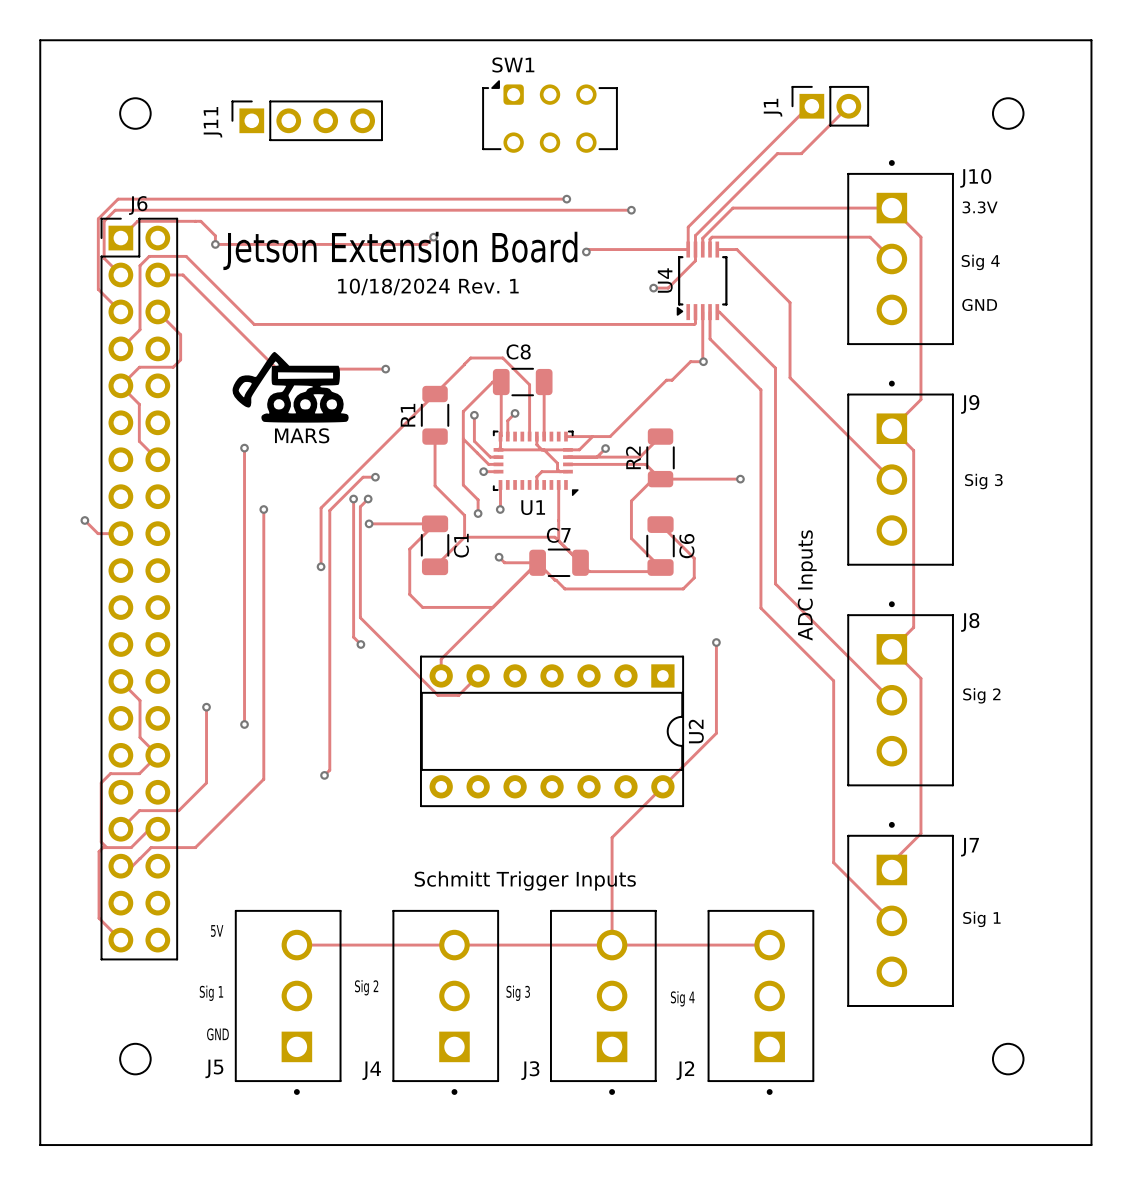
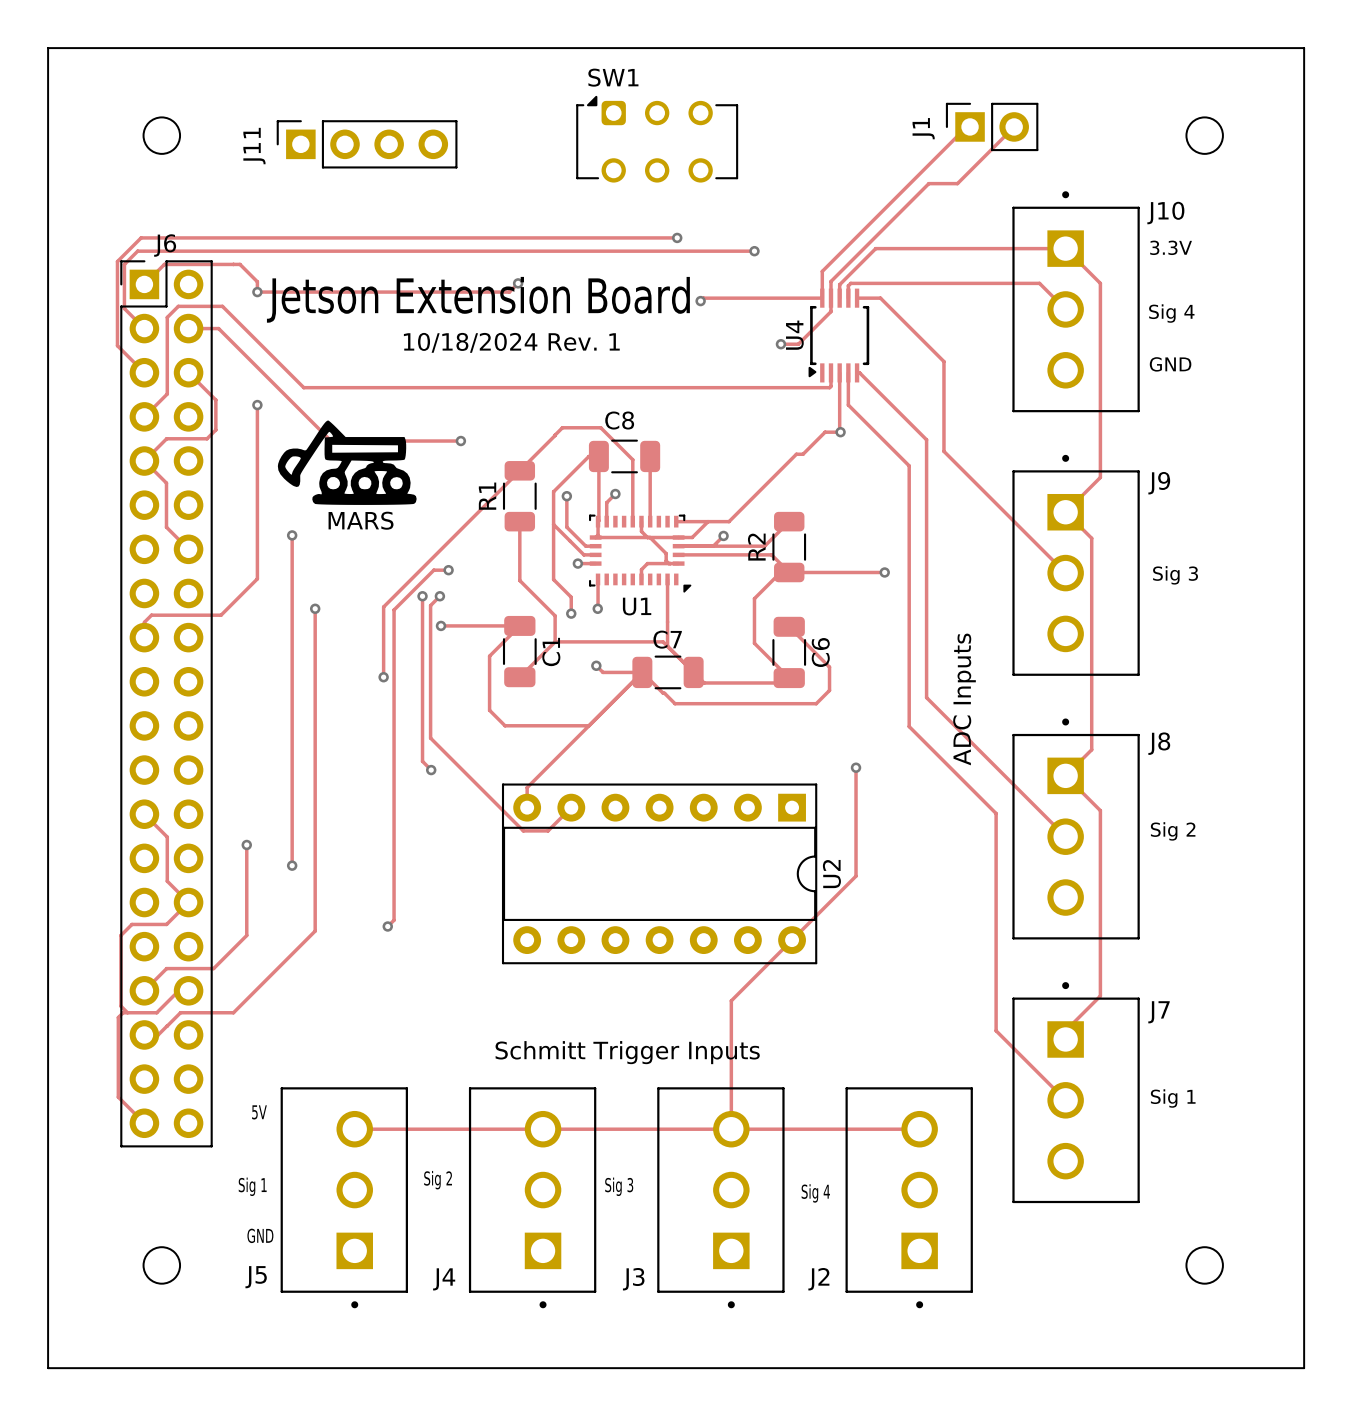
via: none -> (257, 405)
track: (84, 520) (98, 533) (120, 533) -> (257, 405) (257, 578) (221, 615) (151, 615) (144, 622) (144, 637)
via: (84, 520) -> none

